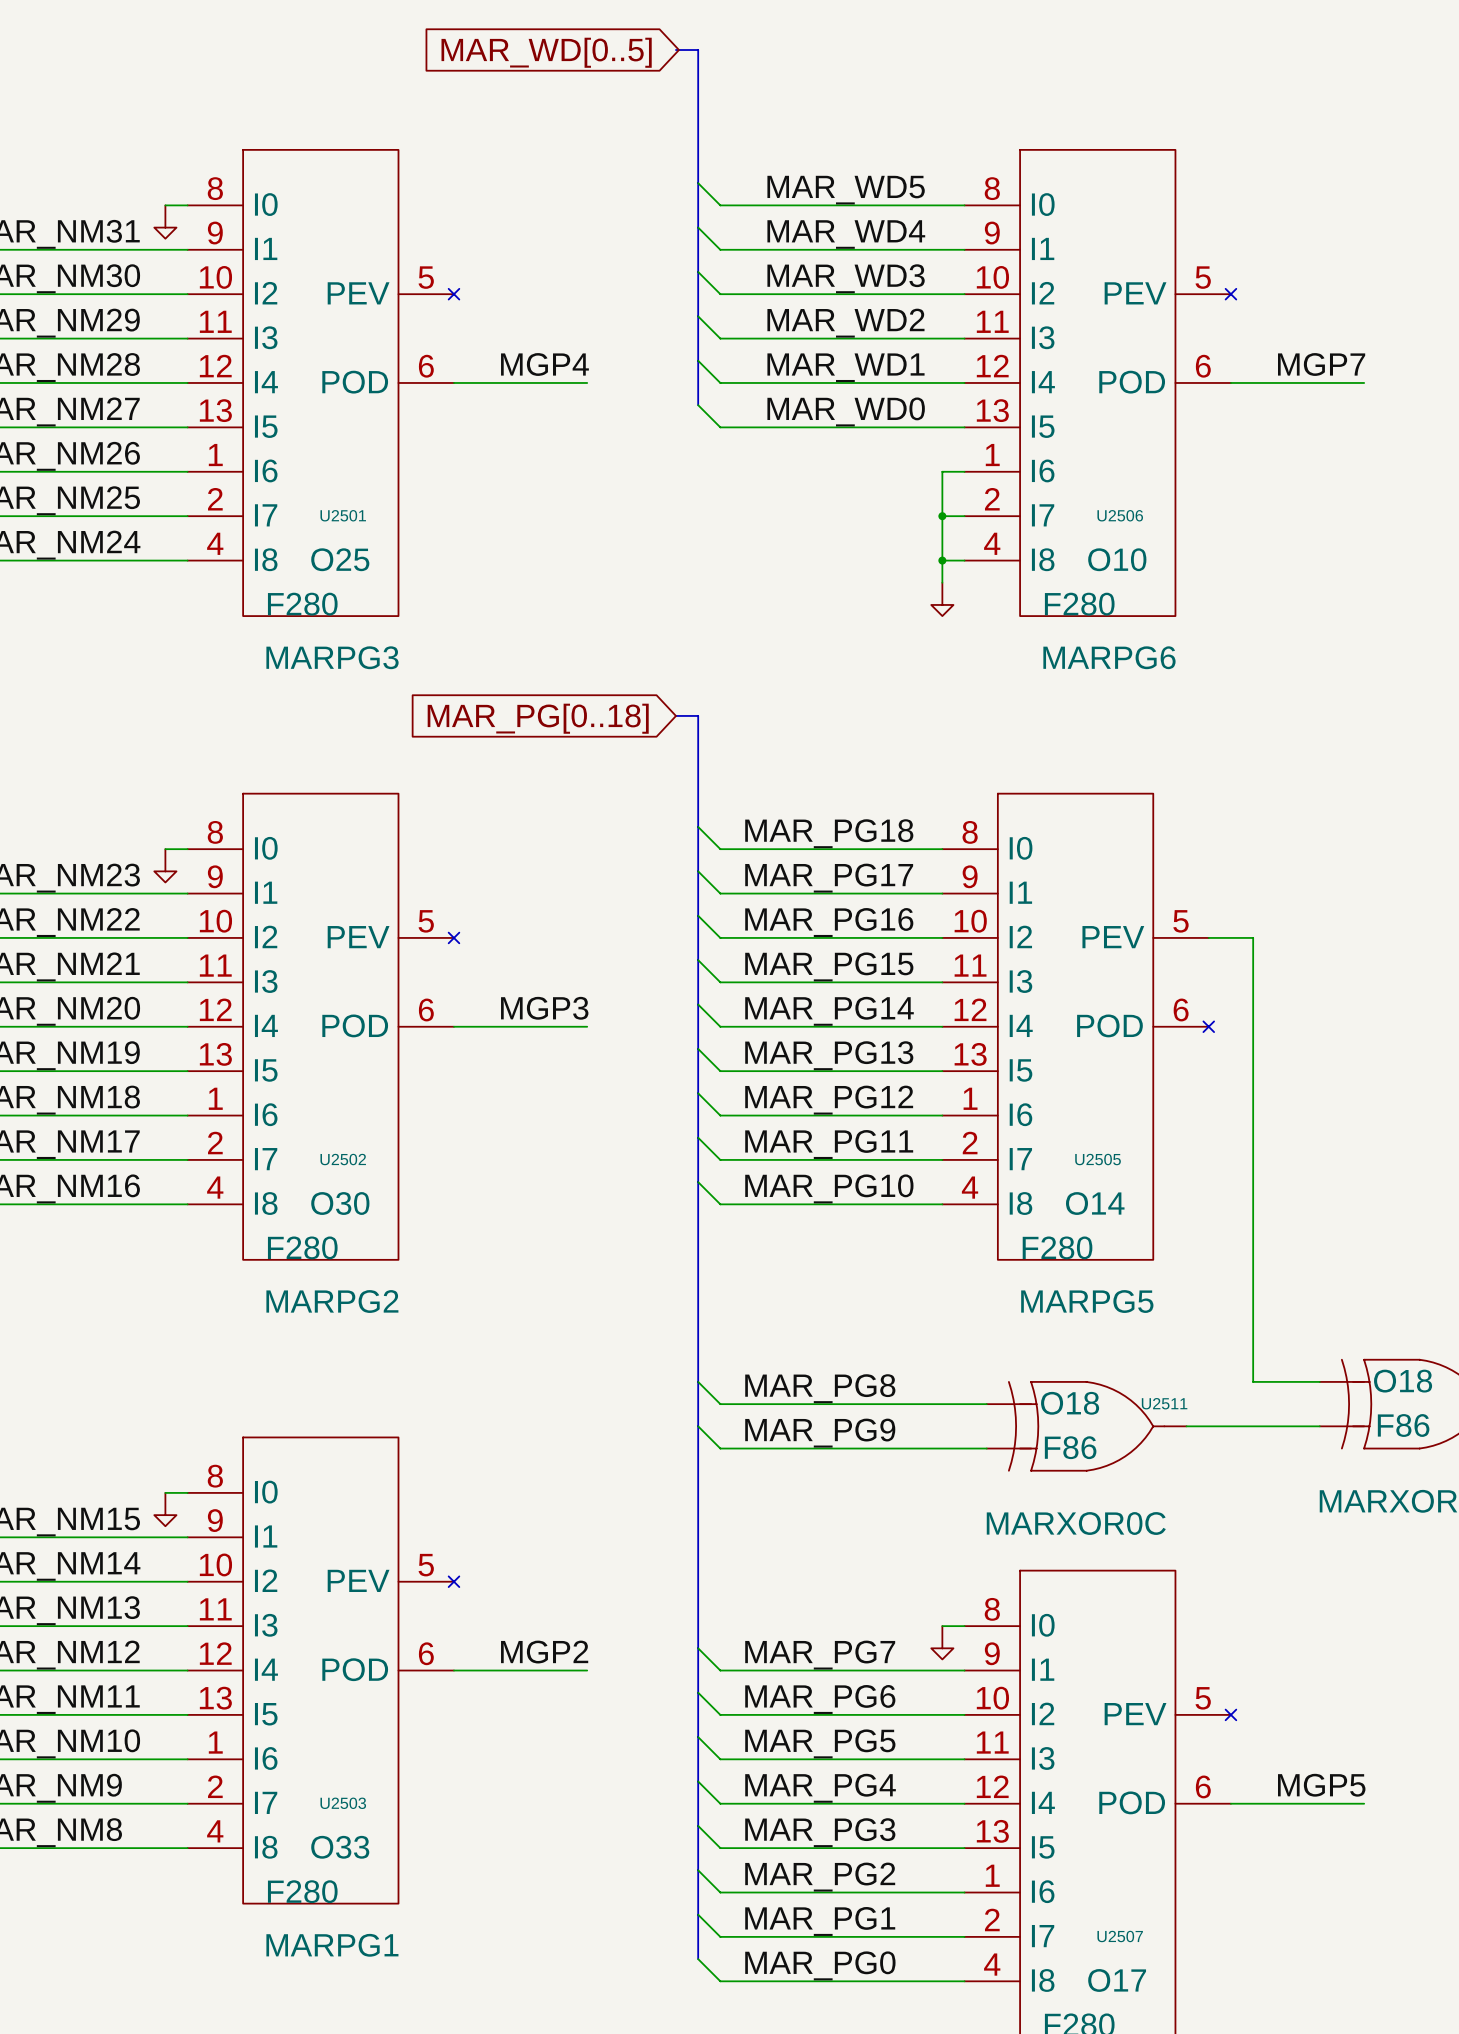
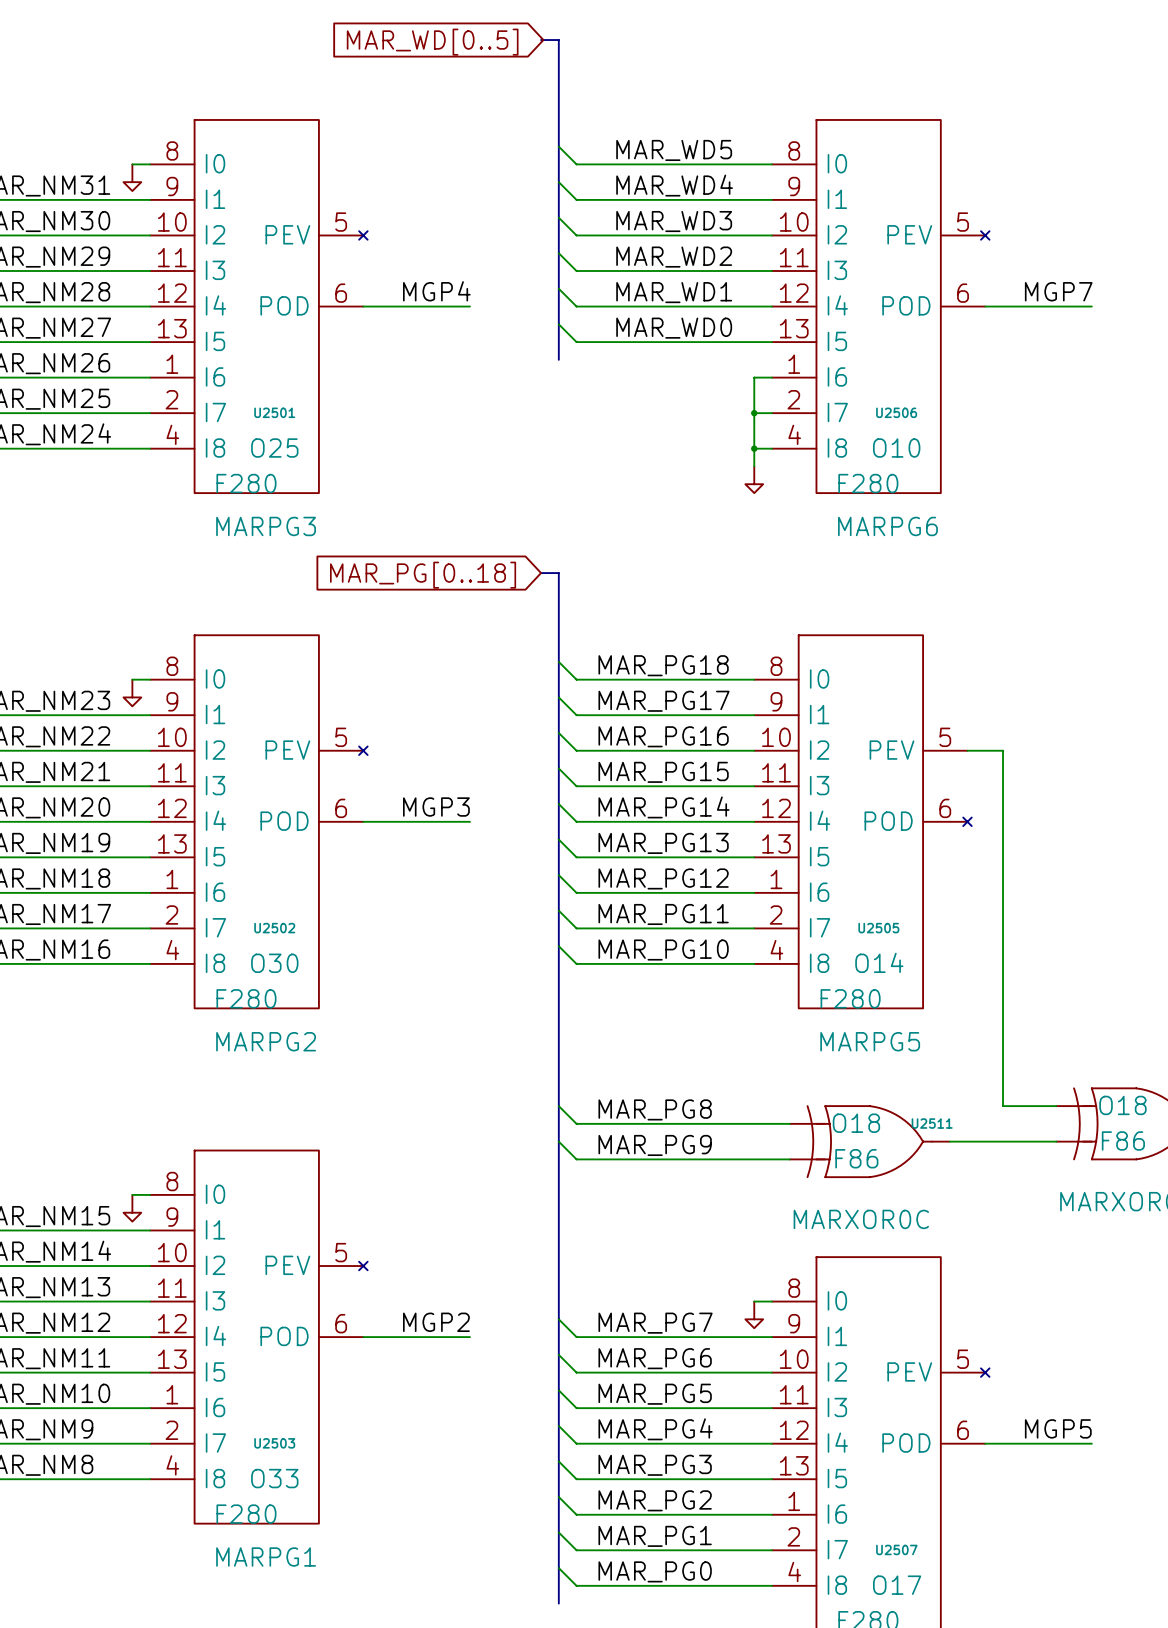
bus: none -> (558, 324) (558, 359)
bus: none -> (558, 1568) (558, 1603)

